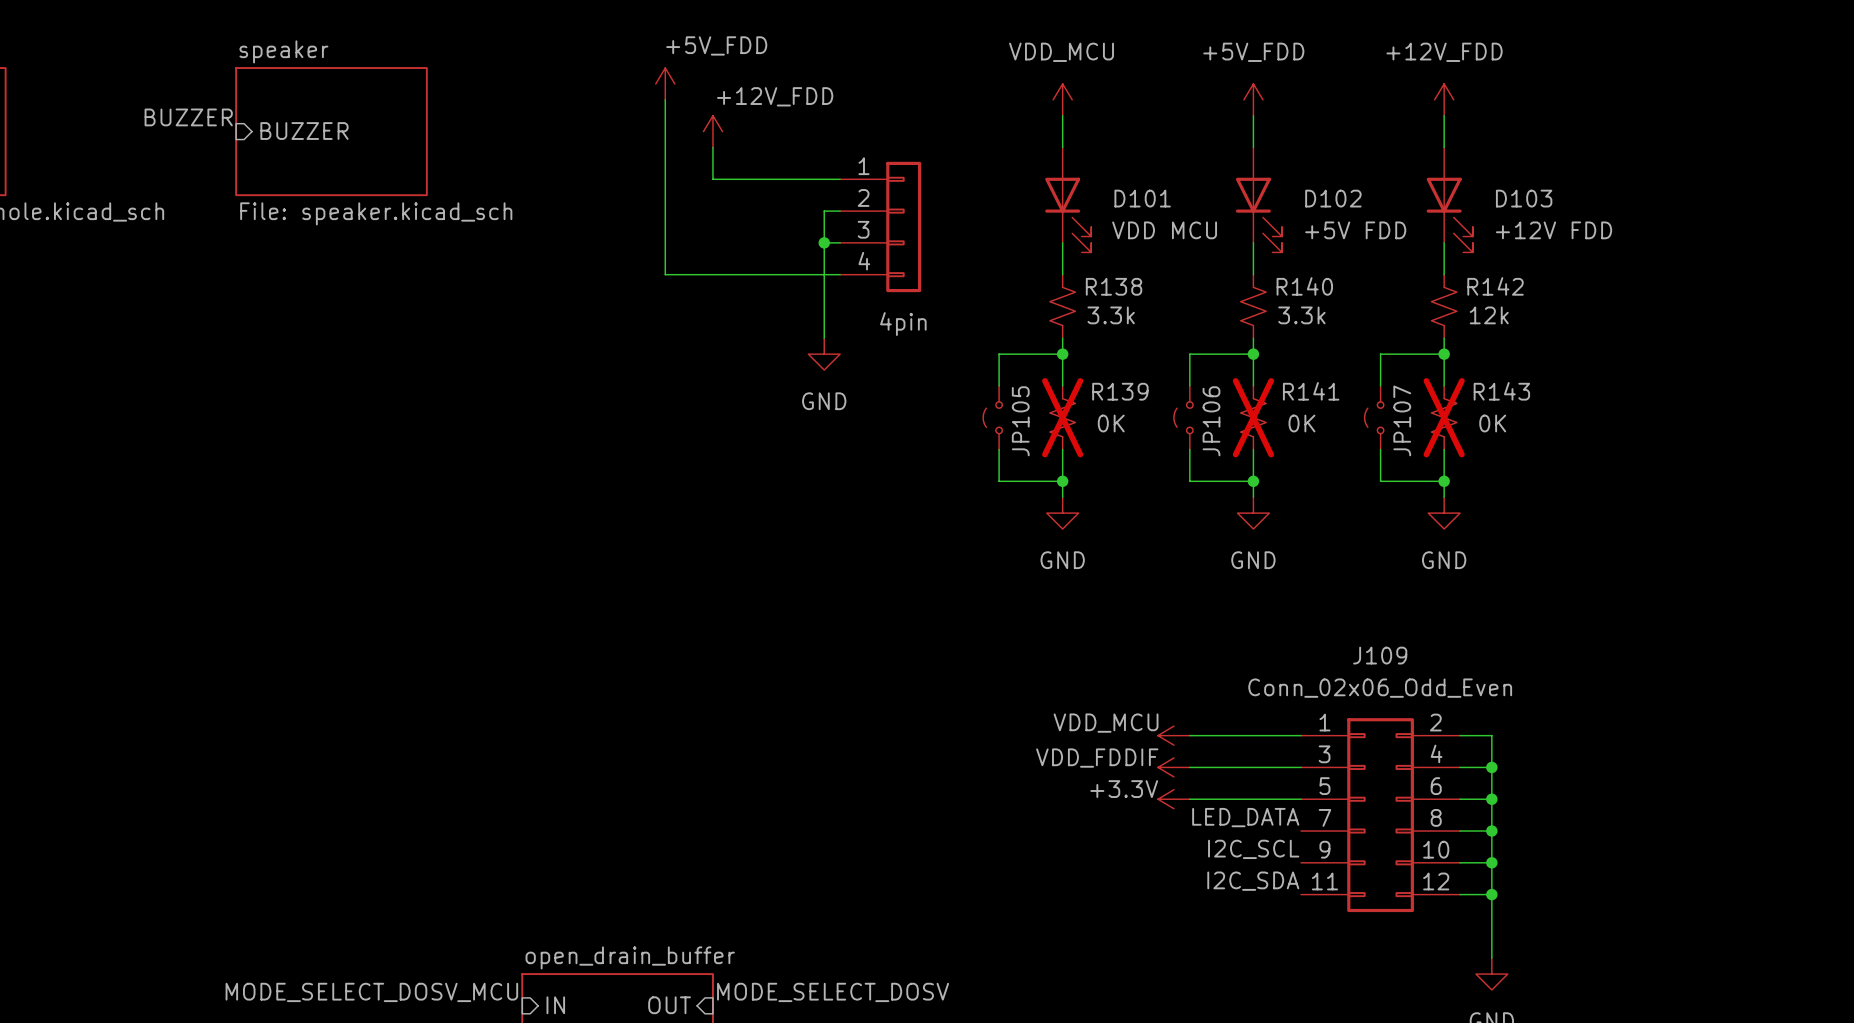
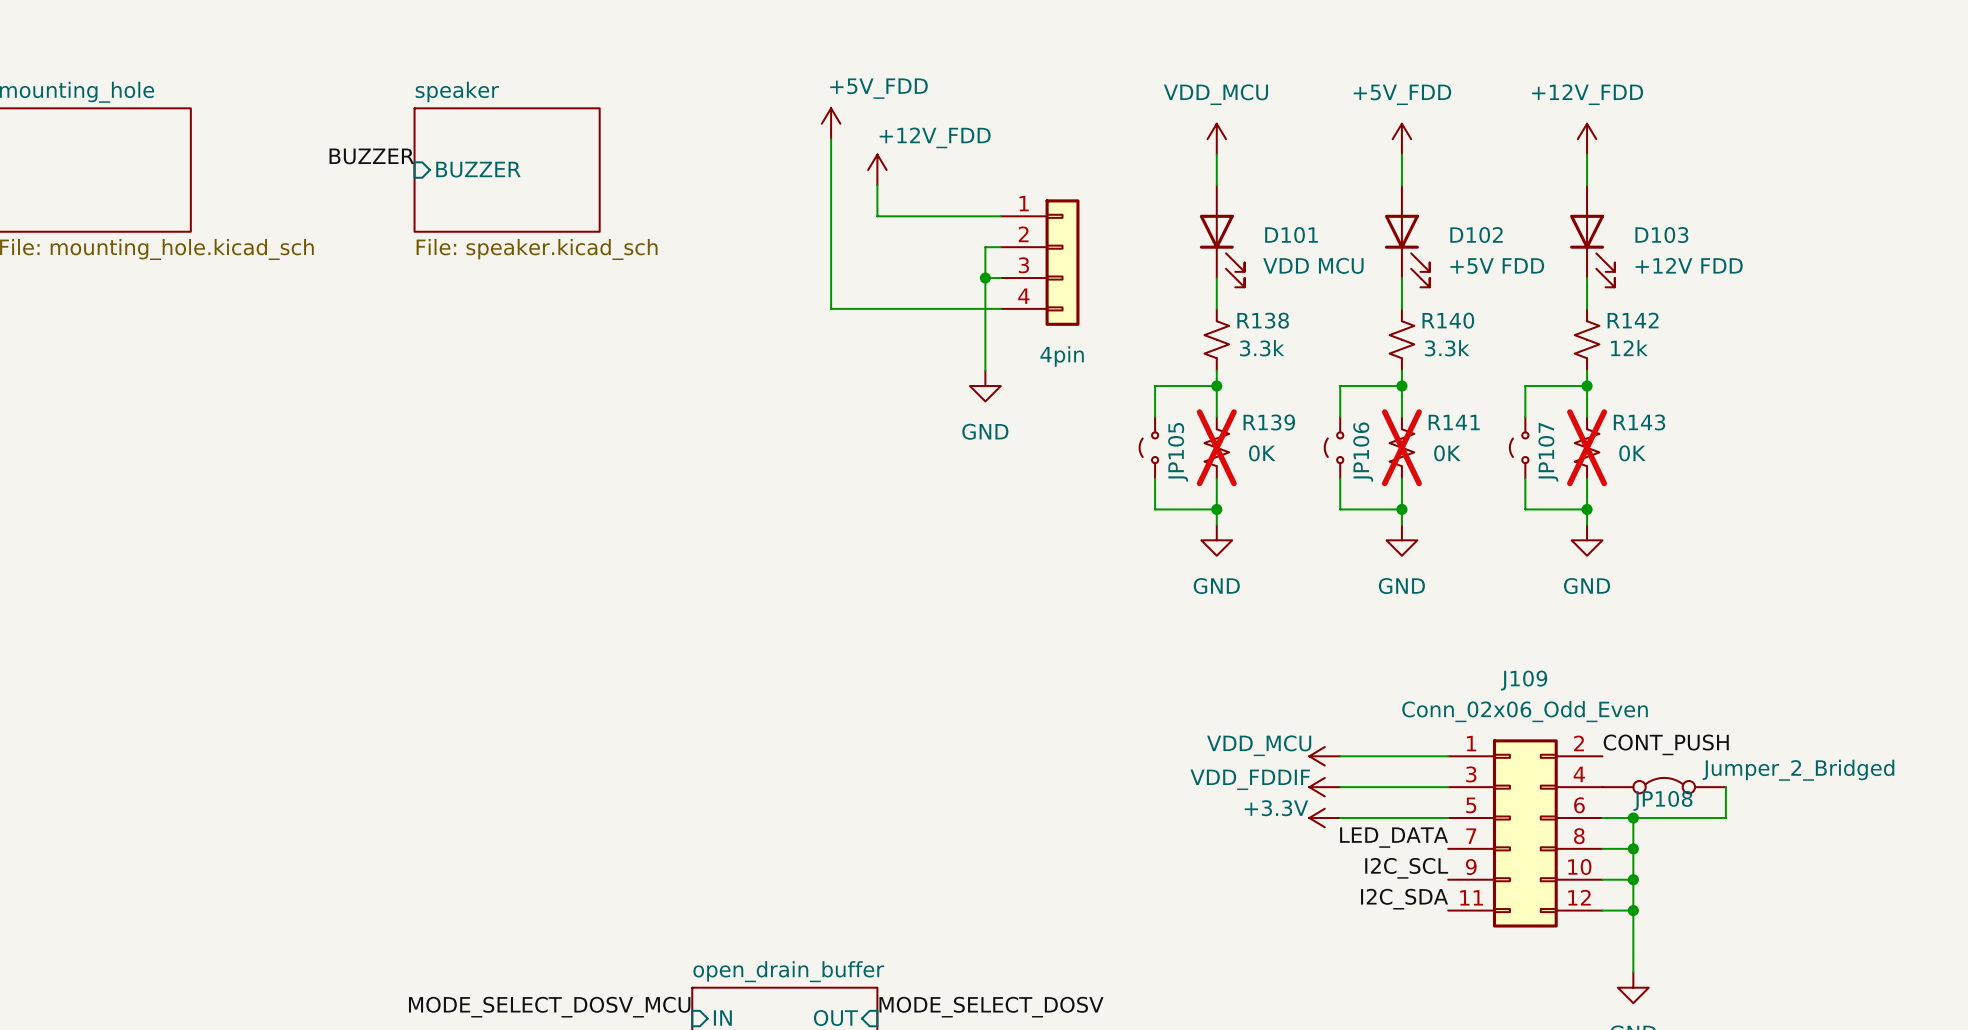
label: none -> CONT_PUSH (1666, 744)
wire: (1460, 735) (1491, 735) (1491, 799) -> (1725, 787) (1725, 818) (1633, 818)
JP108: none -> Jumper_2_Bridged (1664, 785)
junction: (1491, 767) -> none

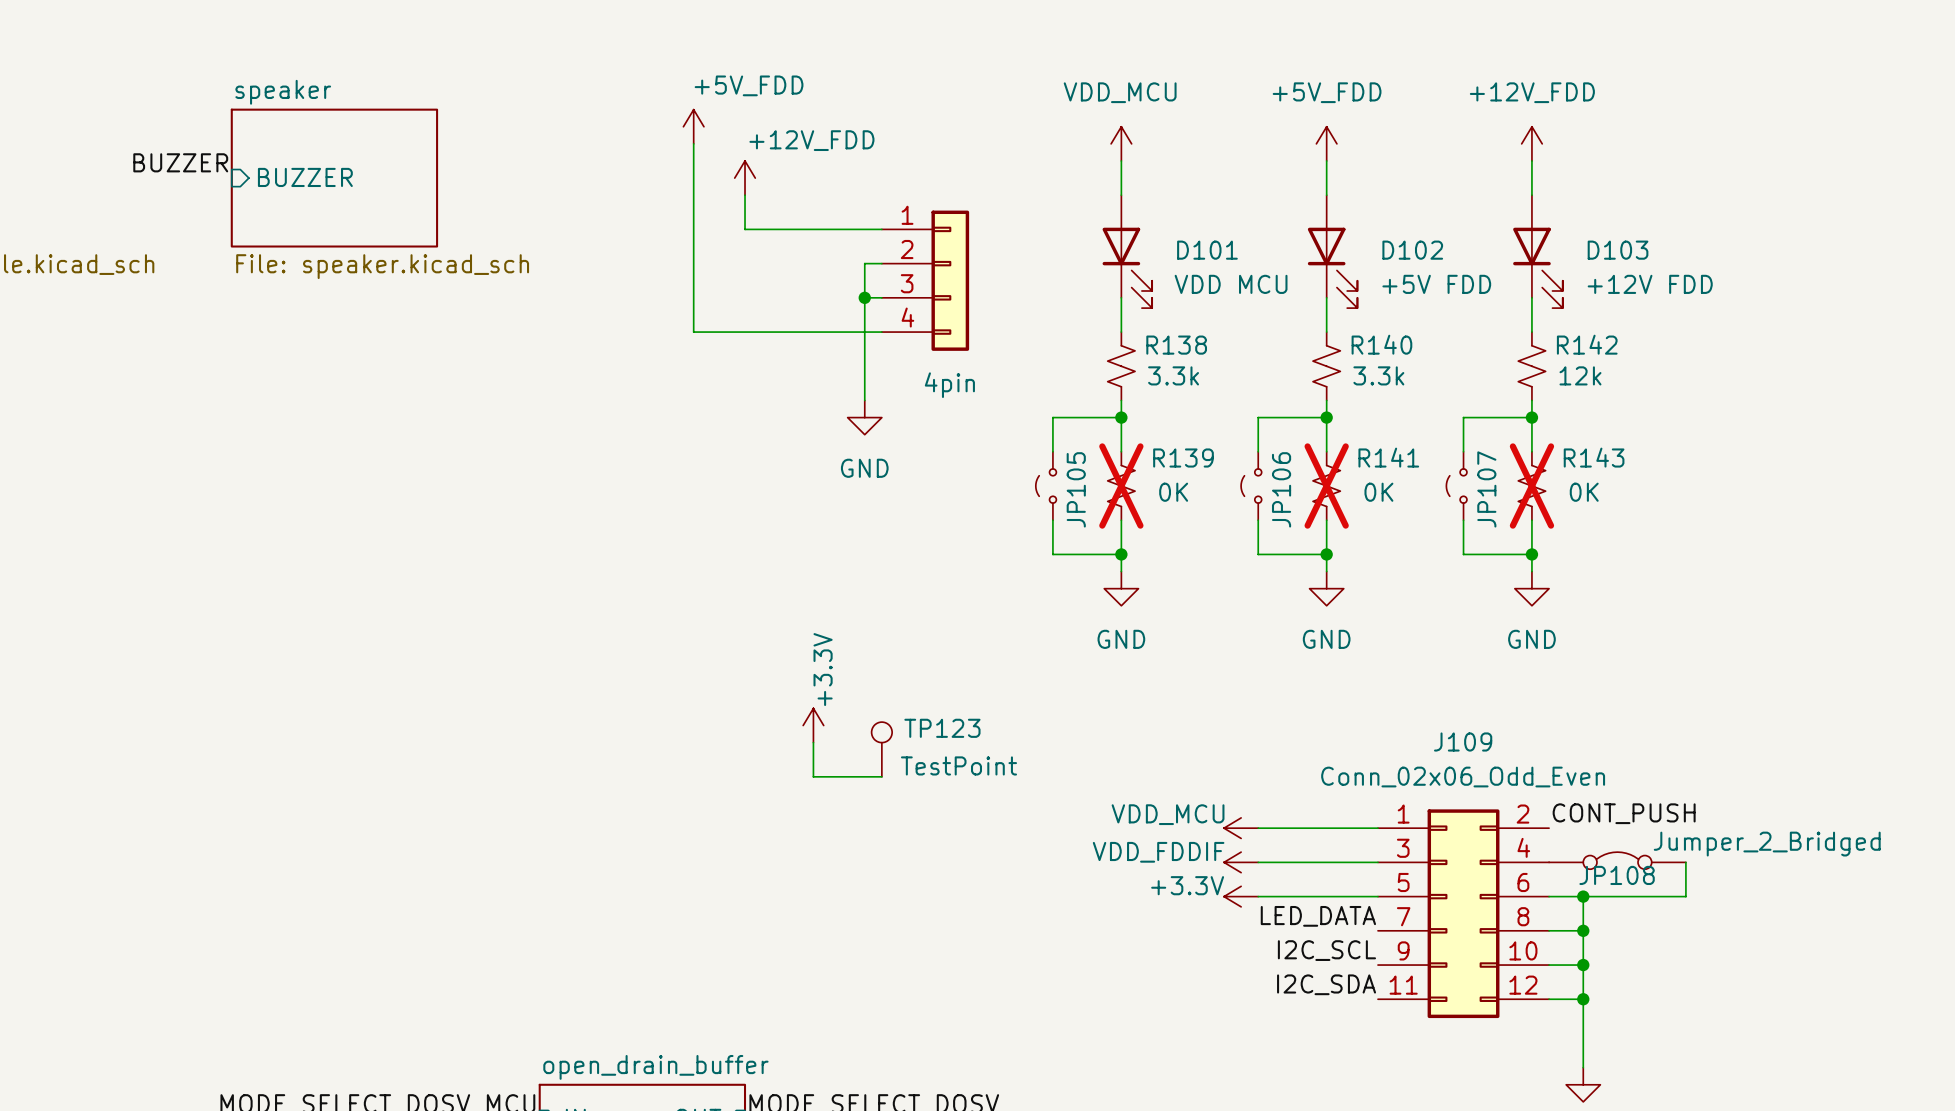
power symbol: none -> +3.3V (813, 725)
wire: none -> (813, 742) (813, 776) (881, 776)
TP123: none -> TestPoint (881, 749)

